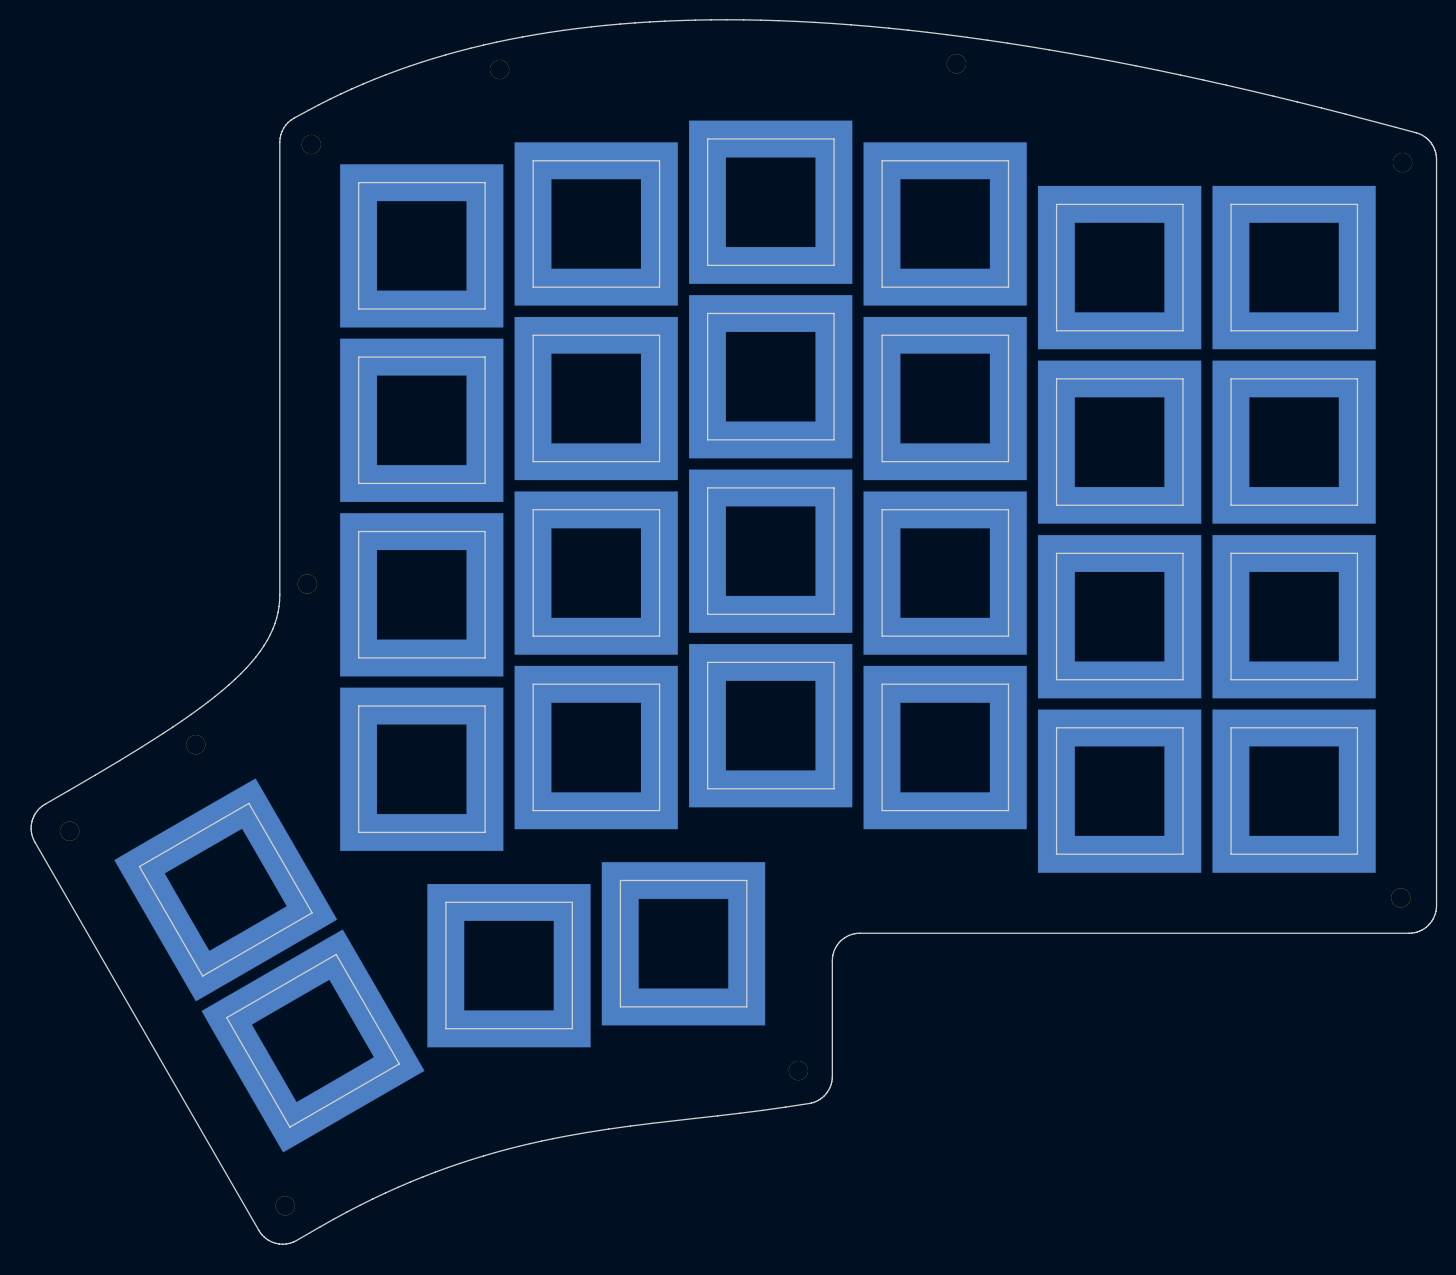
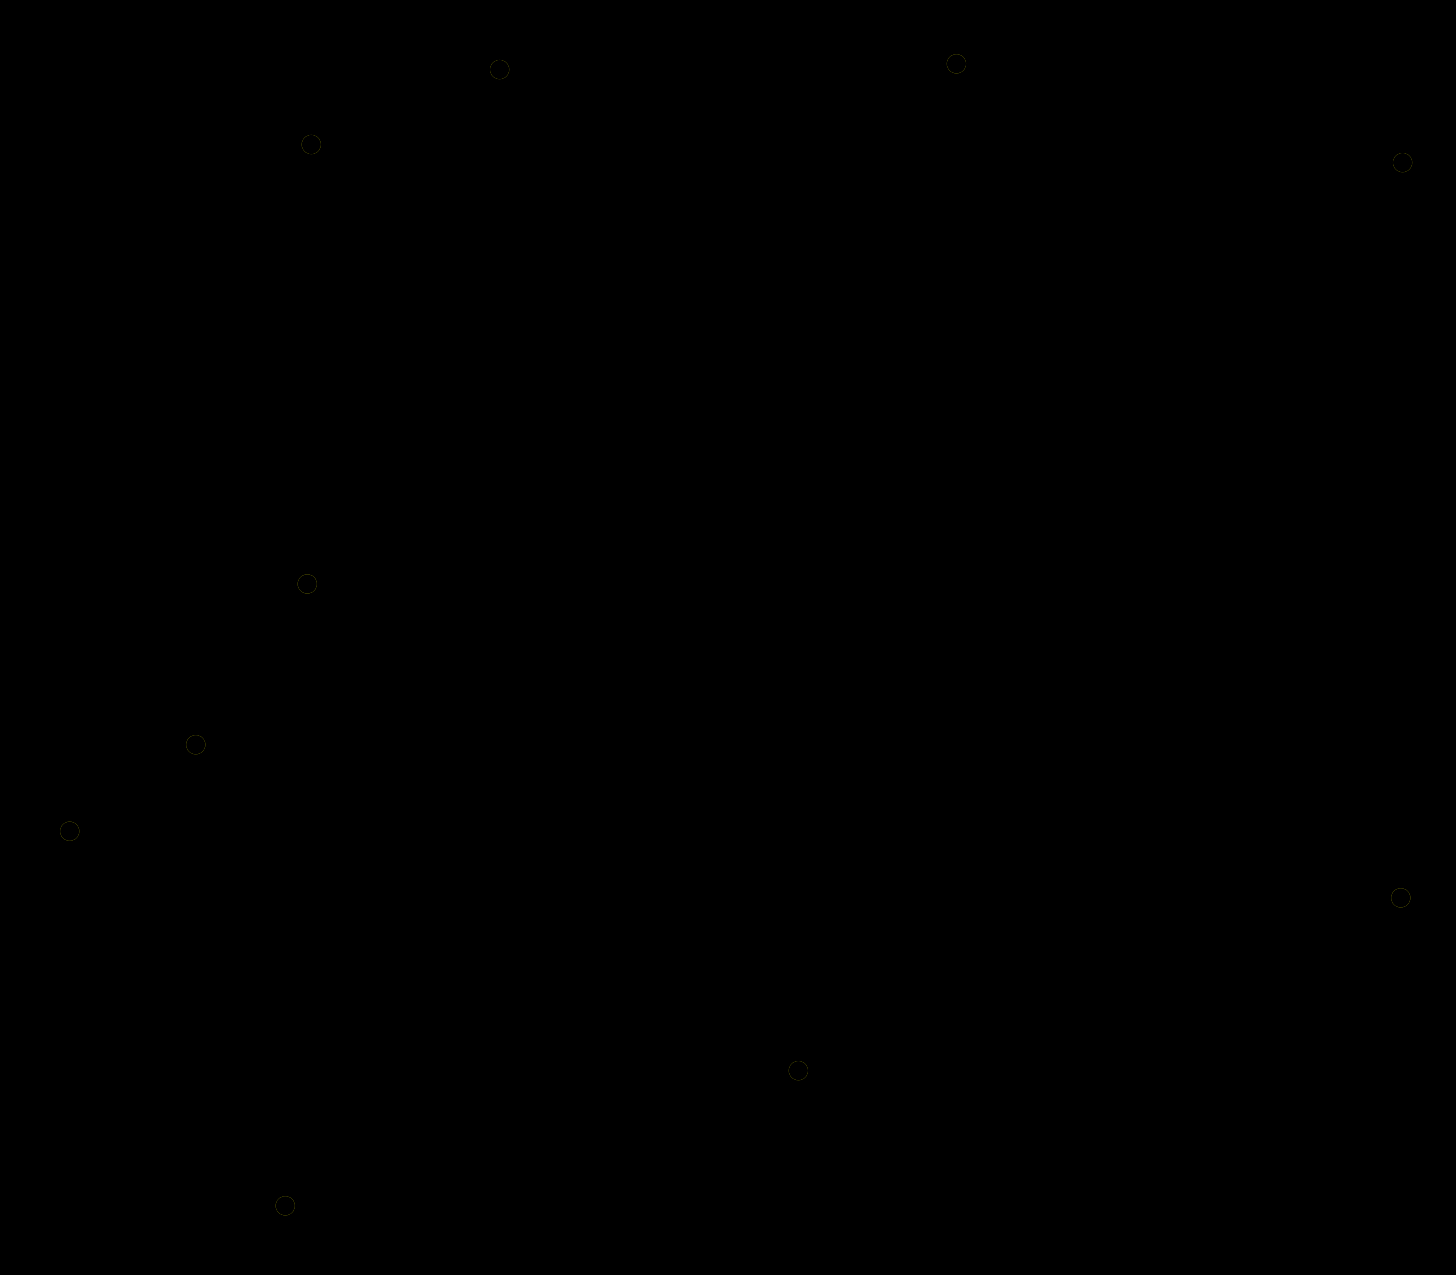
board edge: (726, 19) (814, 22) (888, 28) (987, 40) (1070, 53) (1180, 75) (1297, 101) (1416, 132) (1430, 142) (1436, 159) (1436, 905) (1434, 916) (1424, 928) (1409, 933) (851, 934) (838, 943) (832, 955) (832, 1078) (828, 1090) (818, 1100) (762, 1110) (586, 1132) (507, 1149) (447, 1167) (398, 1187) (346, 1212) (293, 1242) (282, 1244) (273, 1242) (265, 1238) (258, 1230) (34, 841) (31, 828) (33, 816) (42, 805) (163, 733) (222, 690) (256, 656) (267, 640) (274, 623) (279, 594) (279, 142) (282, 131) (294, 118) (351, 88) (409, 66) (470, 48) (536, 34) (591, 26) (649, 21) (726, 19) -> none
drawing: [114, 120, 1376, 1153] -> none
board edge: (834, 138) (834, 265) (707, 265) (707, 138) (834, 138) -> none
board edge: (659, 160) (659, 287) (533, 287) (533, 160) (659, 160) -> none
board edge: (1008, 160) (882, 160) (882, 287) (1008, 287) (1008, 160) -> none
board edge: (485, 182) (485, 308) (358, 308) (358, 182) (485, 182) -> none
board edge: (1182, 204) (1182, 330) (1056, 330) (1056, 204) (1182, 204) -> none
board edge: (1357, 204) (1231, 204) (1231, 330) (1357, 330) (1357, 204) -> none
board edge: (834, 313) (834, 439) (707, 439) (707, 313) (834, 313) -> none
board edge: (659, 335) (533, 335) (533, 461) (659, 461) (659, 335) -> none
board edge: (1008, 335) (882, 335) (882, 461) (1008, 461) (1008, 335) -> none
board edge: (485, 357) (358, 357) (358, 483) (485, 483) (485, 357) -> none
board edge: (1182, 378) (1056, 378) (1056, 505) (1182, 505) (1182, 378) -> none
board edge: (1357, 378) (1231, 378) (1231, 505) (1357, 505) (1357, 378) -> none
board edge: (834, 487) (707, 487) (707, 614) (834, 614) (834, 487) -> none
board edge: (659, 509) (659, 636) (533, 636) (533, 509) (659, 509) -> none
board edge: (1008, 509) (882, 509) (882, 636) (1008, 636) (1008, 509) -> none
board edge: (485, 531) (485, 657) (358, 657) (358, 531) (485, 531) -> none
board edge: (1182, 553) (1182, 679) (1056, 679) (1056, 553) (1182, 553) -> none
board edge: (1357, 553) (1231, 553) (1231, 679) (1357, 679) (1357, 553) -> none
board edge: (834, 662) (834, 788) (707, 788) (707, 662) (834, 662) -> none
board edge: (659, 684) (659, 810) (533, 810) (533, 684) (659, 684) -> none
board edge: (1008, 684) (882, 684) (882, 810) (1008, 810) (1008, 684) -> none
board edge: (485, 706) (485, 832) (358, 832) (358, 706) (485, 706) -> none
board edge: (1182, 727) (1182, 854) (1056, 854) (1056, 727) (1182, 727) -> none
board edge: (1357, 727) (1357, 854) (1231, 854) (1231, 727) (1357, 727) -> none
board edge: (248, 803) (312, 912) (202, 976) (139, 866) (248, 803) -> none
board edge: (746, 880) (620, 880) (620, 1006) (746, 1006) (746, 880) -> none
board edge: (572, 902) (445, 902) (445, 1028) (572, 1028) (572, 902) -> none
board edge: (336, 954) (399, 1063) (289, 1127) (226, 1017) (336, 954) -> none

